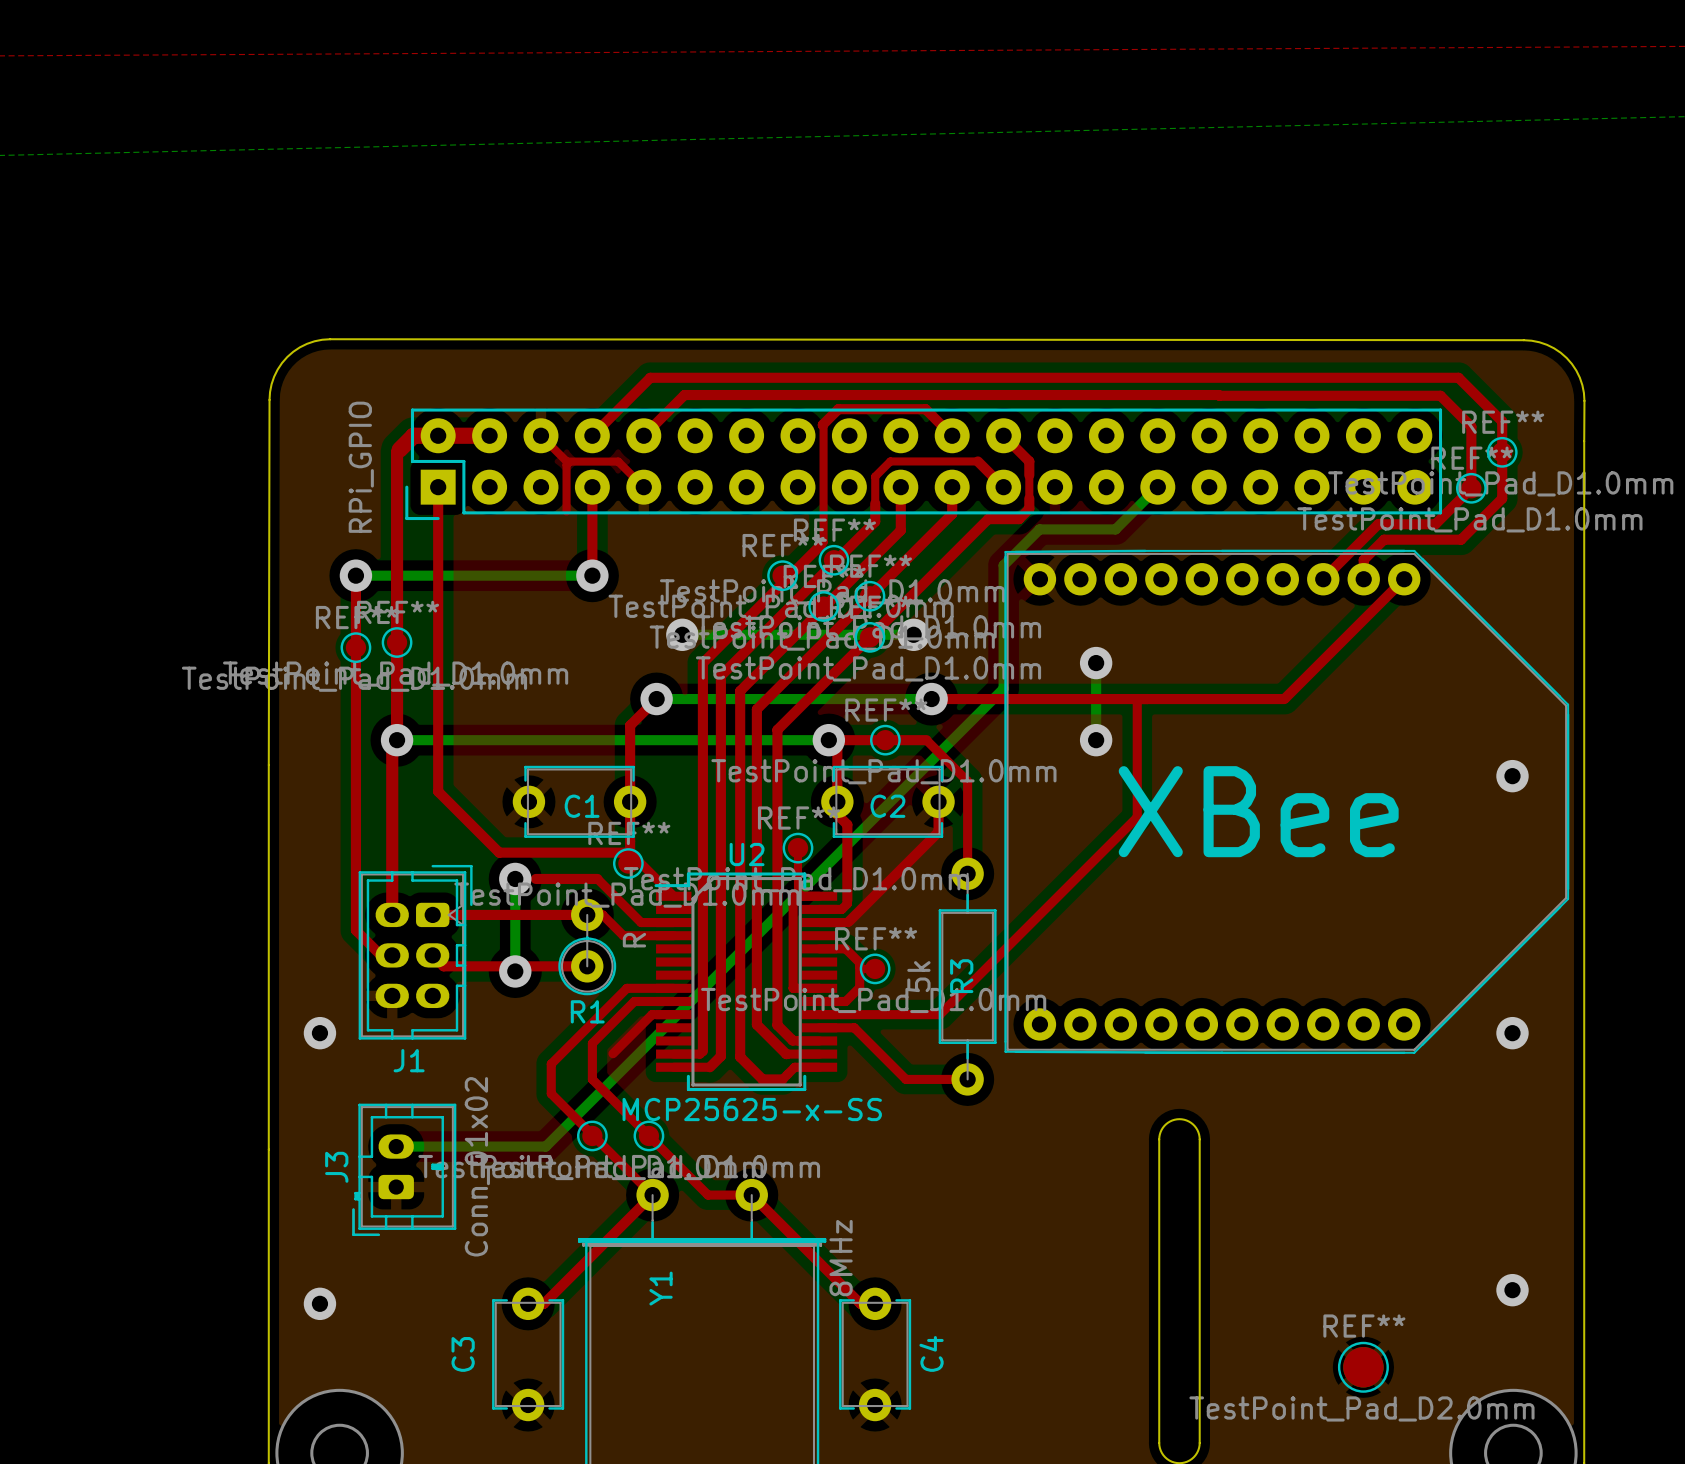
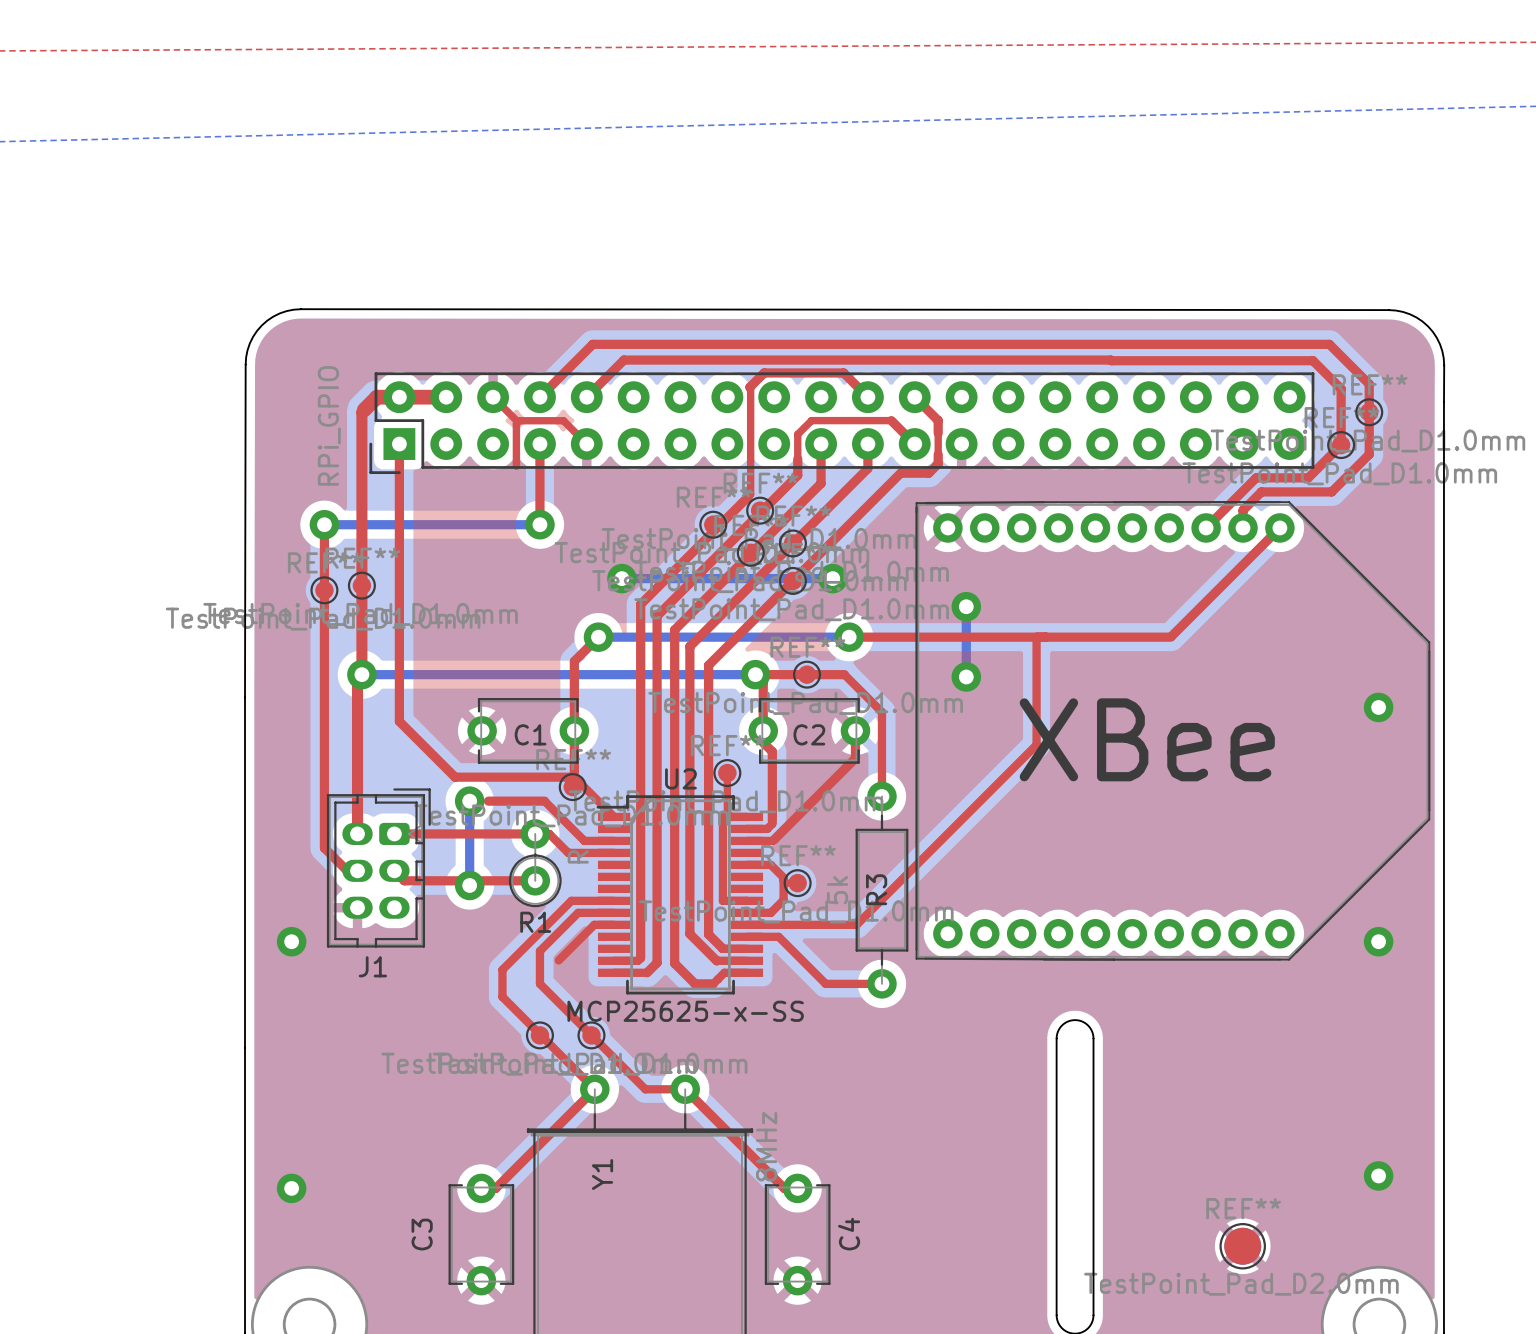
bottom track: (1157, 487) (1115, 529) (1039, 529) (1003, 565) (1003, 688) (545, 1146) (396, 1146) -> none
bottom track: (1096, 663) (1096, 740) -> (966, 606) (966, 676)
via position: (1096, 663) -> (966, 606)
via position: (1096, 740) -> (966, 676)
J3: Conn_01x02 (404, 1169) -> none

